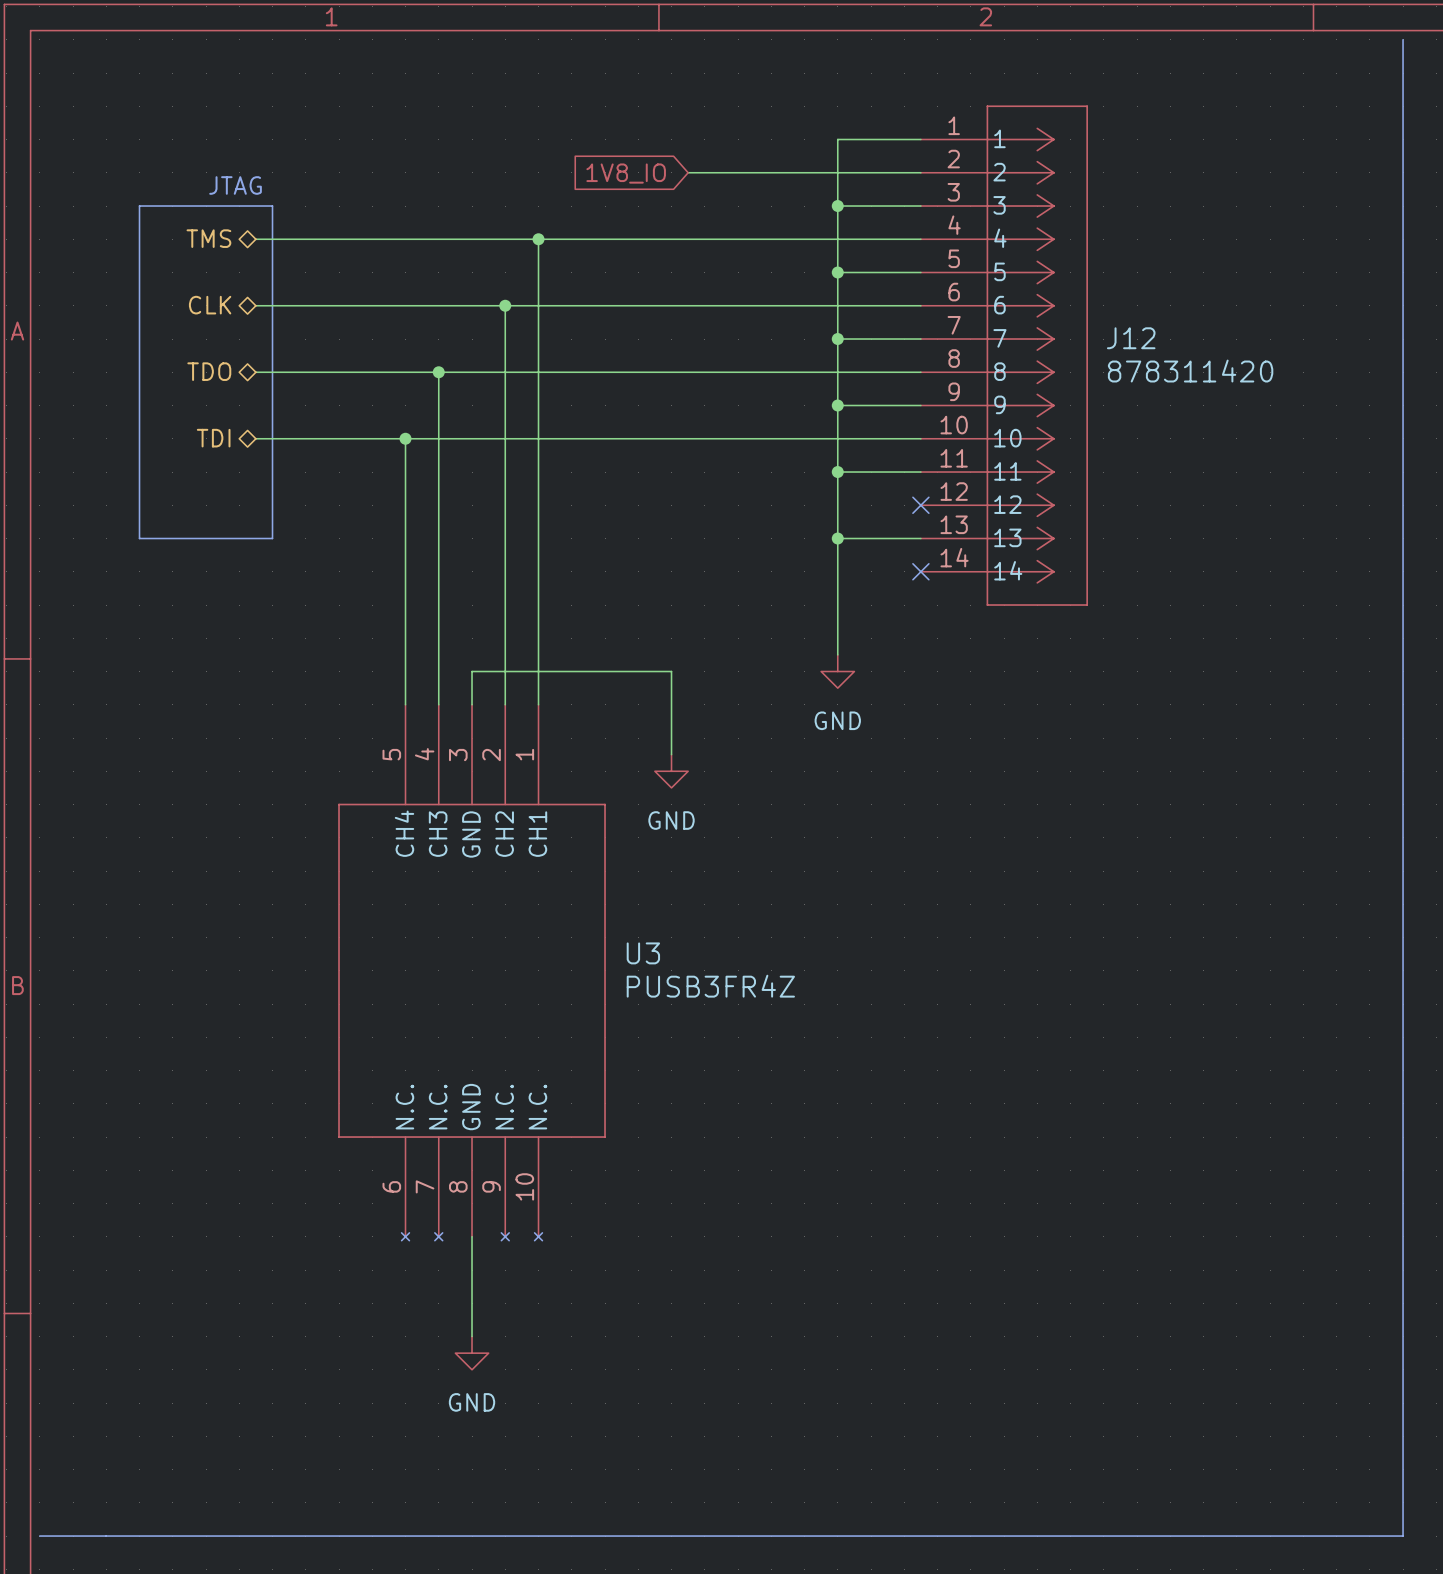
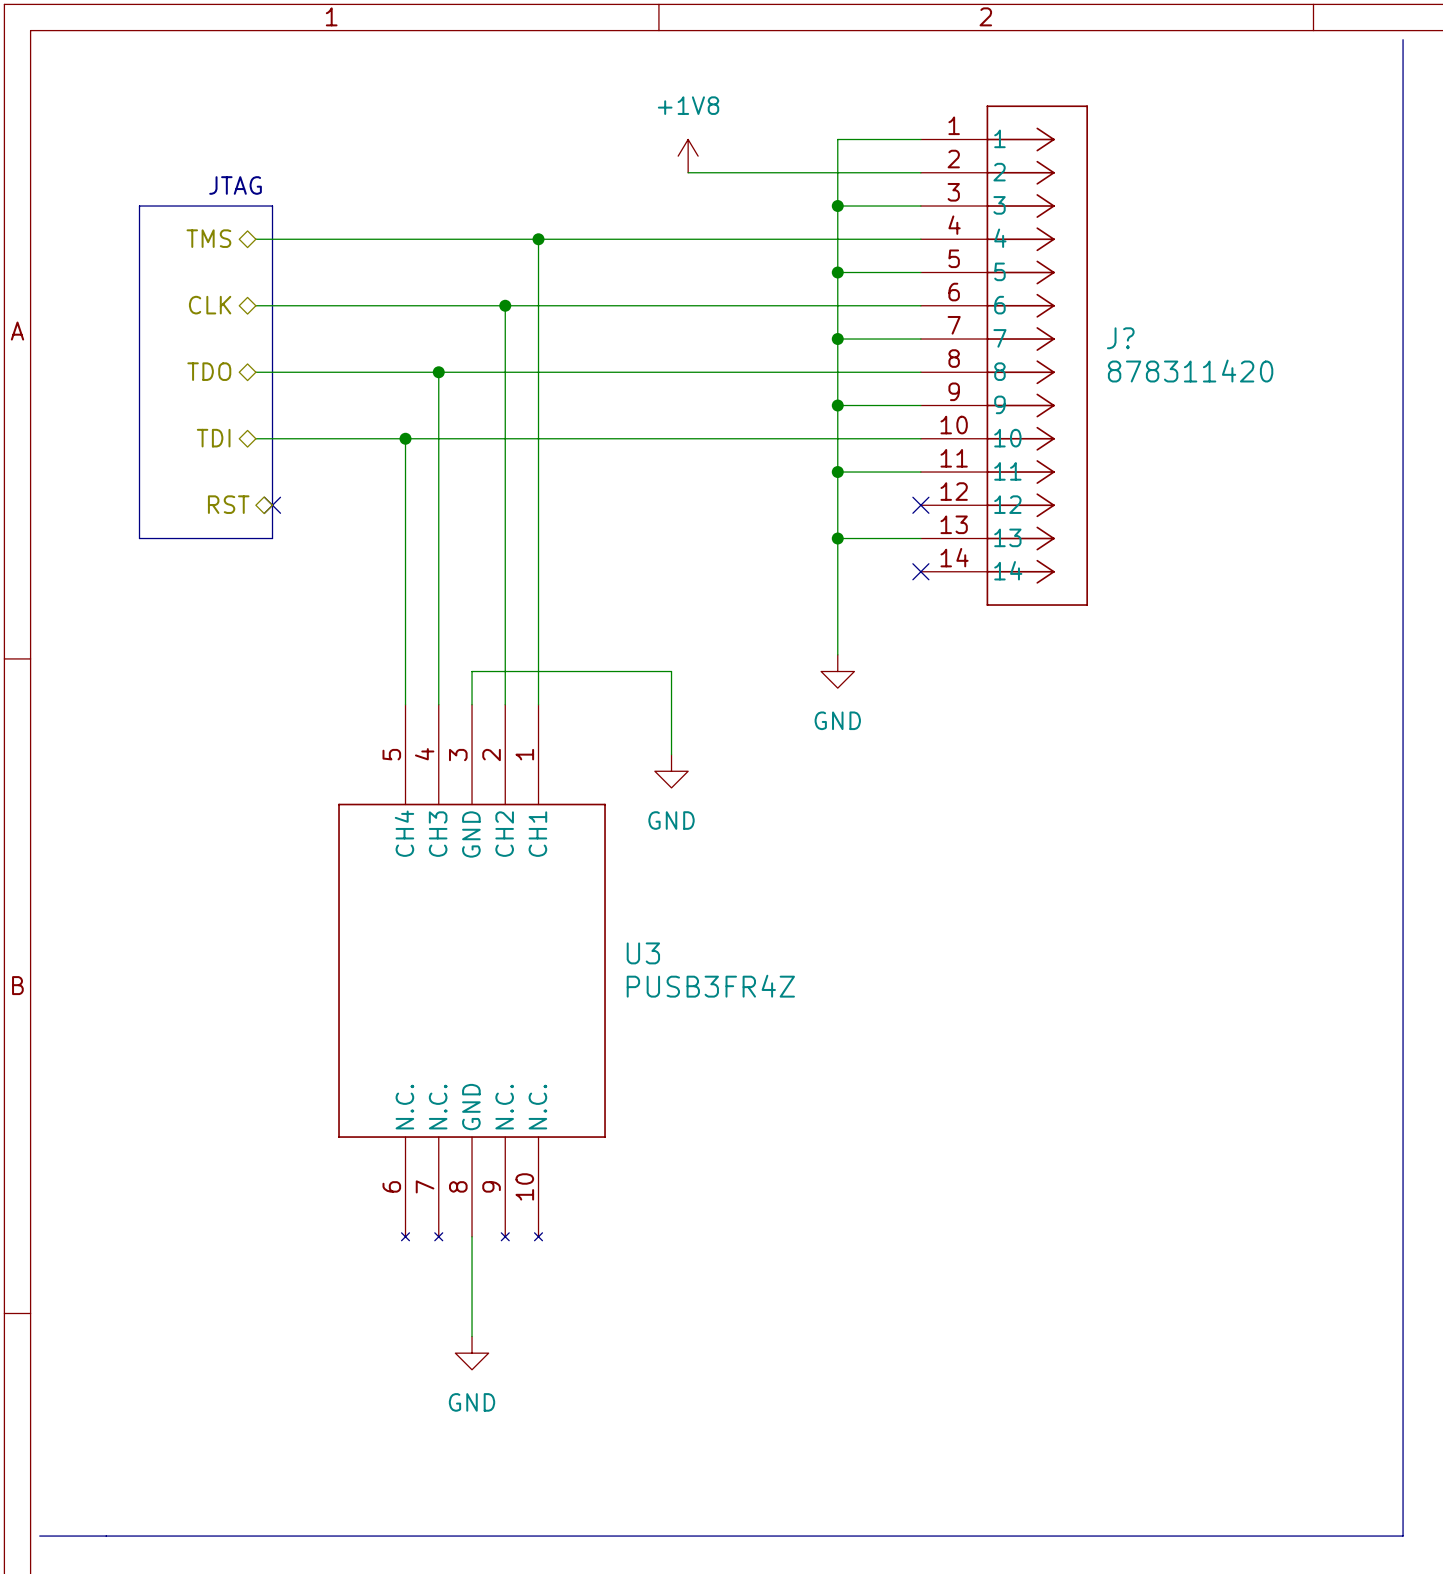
power symbol: none -> +1V8 (688, 156)
global label: 1V8_IO (626, 173) -> none
J12 name: J12 (1131, 338) -> J? (1120, 338)
hierarchical label: none -> RST (228, 504)
no-connect mark: none -> (272, 505)

